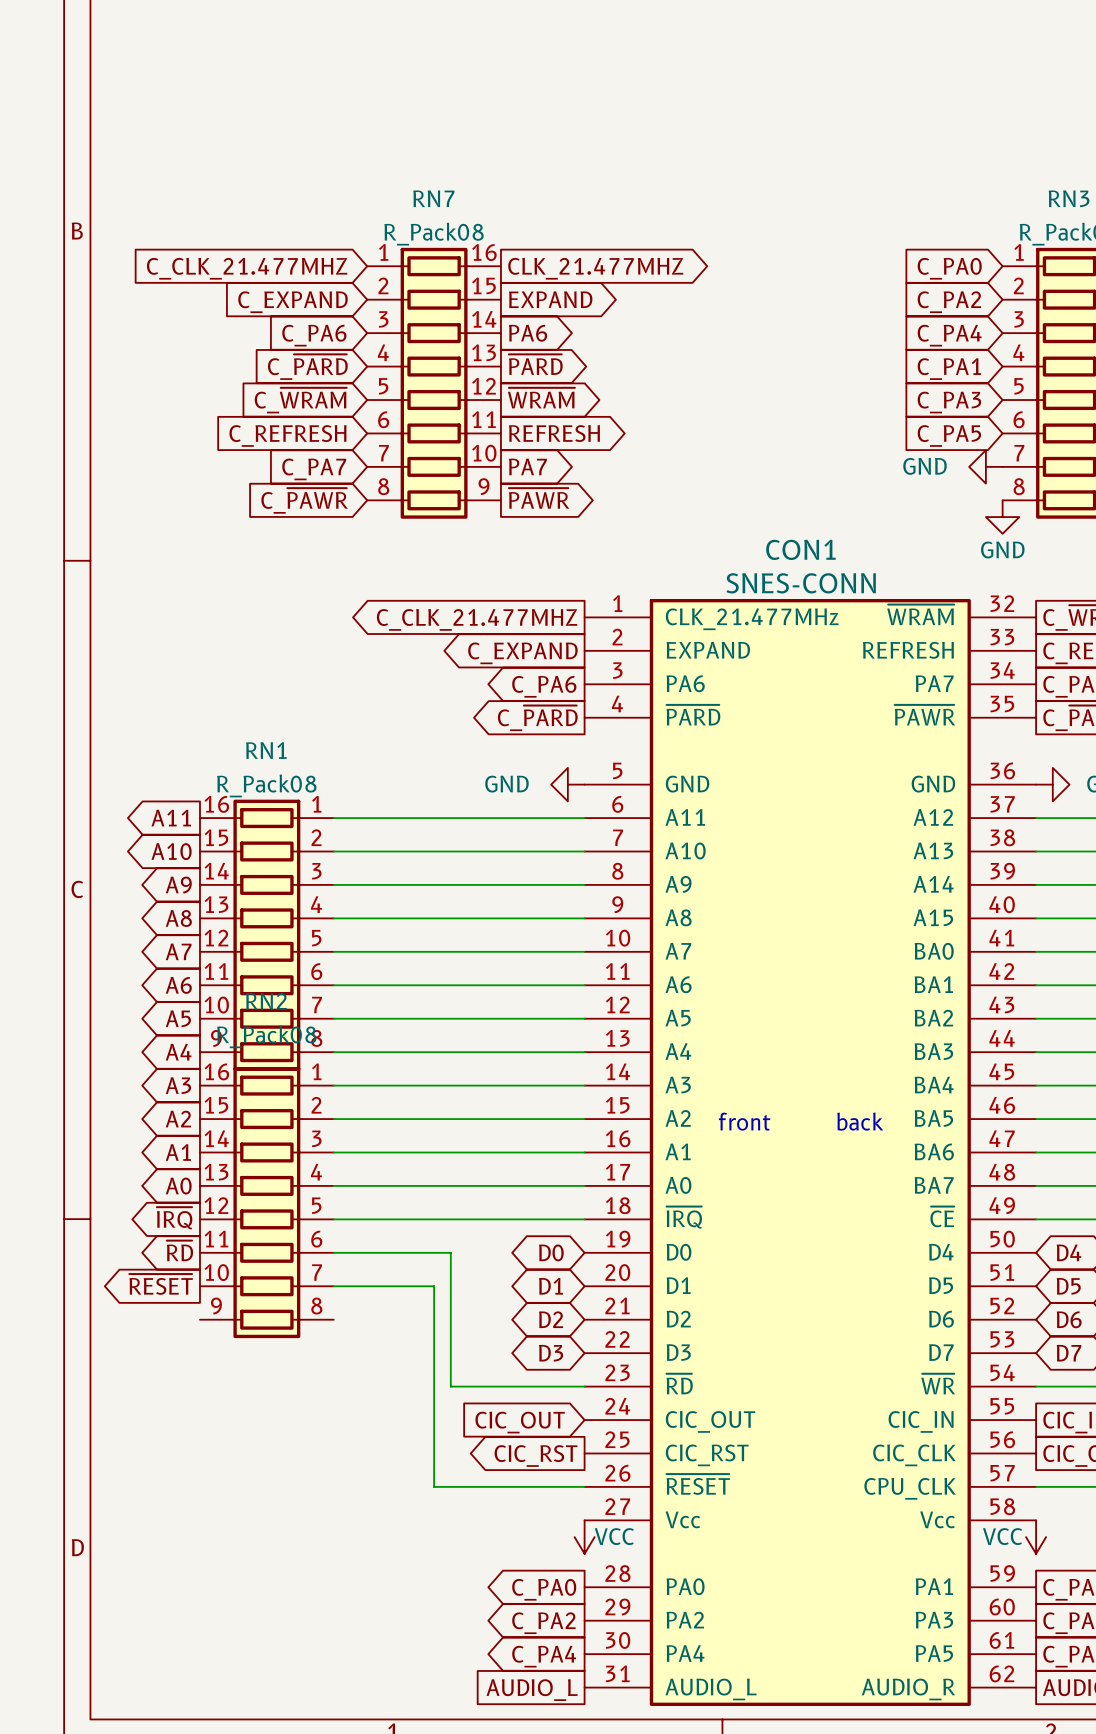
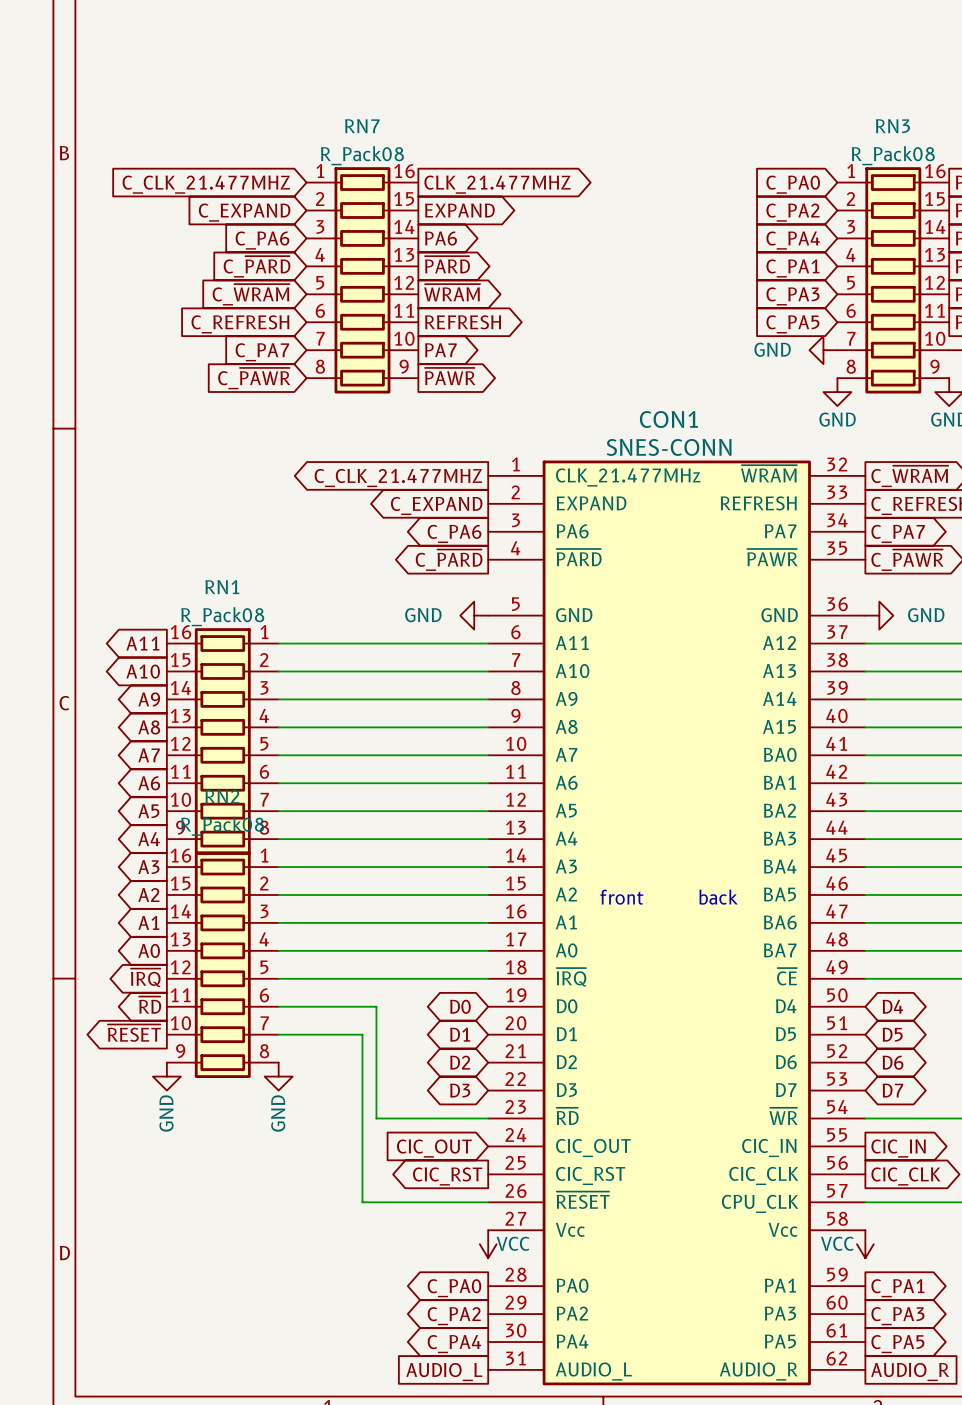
power symbol: none -> GND (166, 1076)
power symbol: none -> GND (278, 1076)

